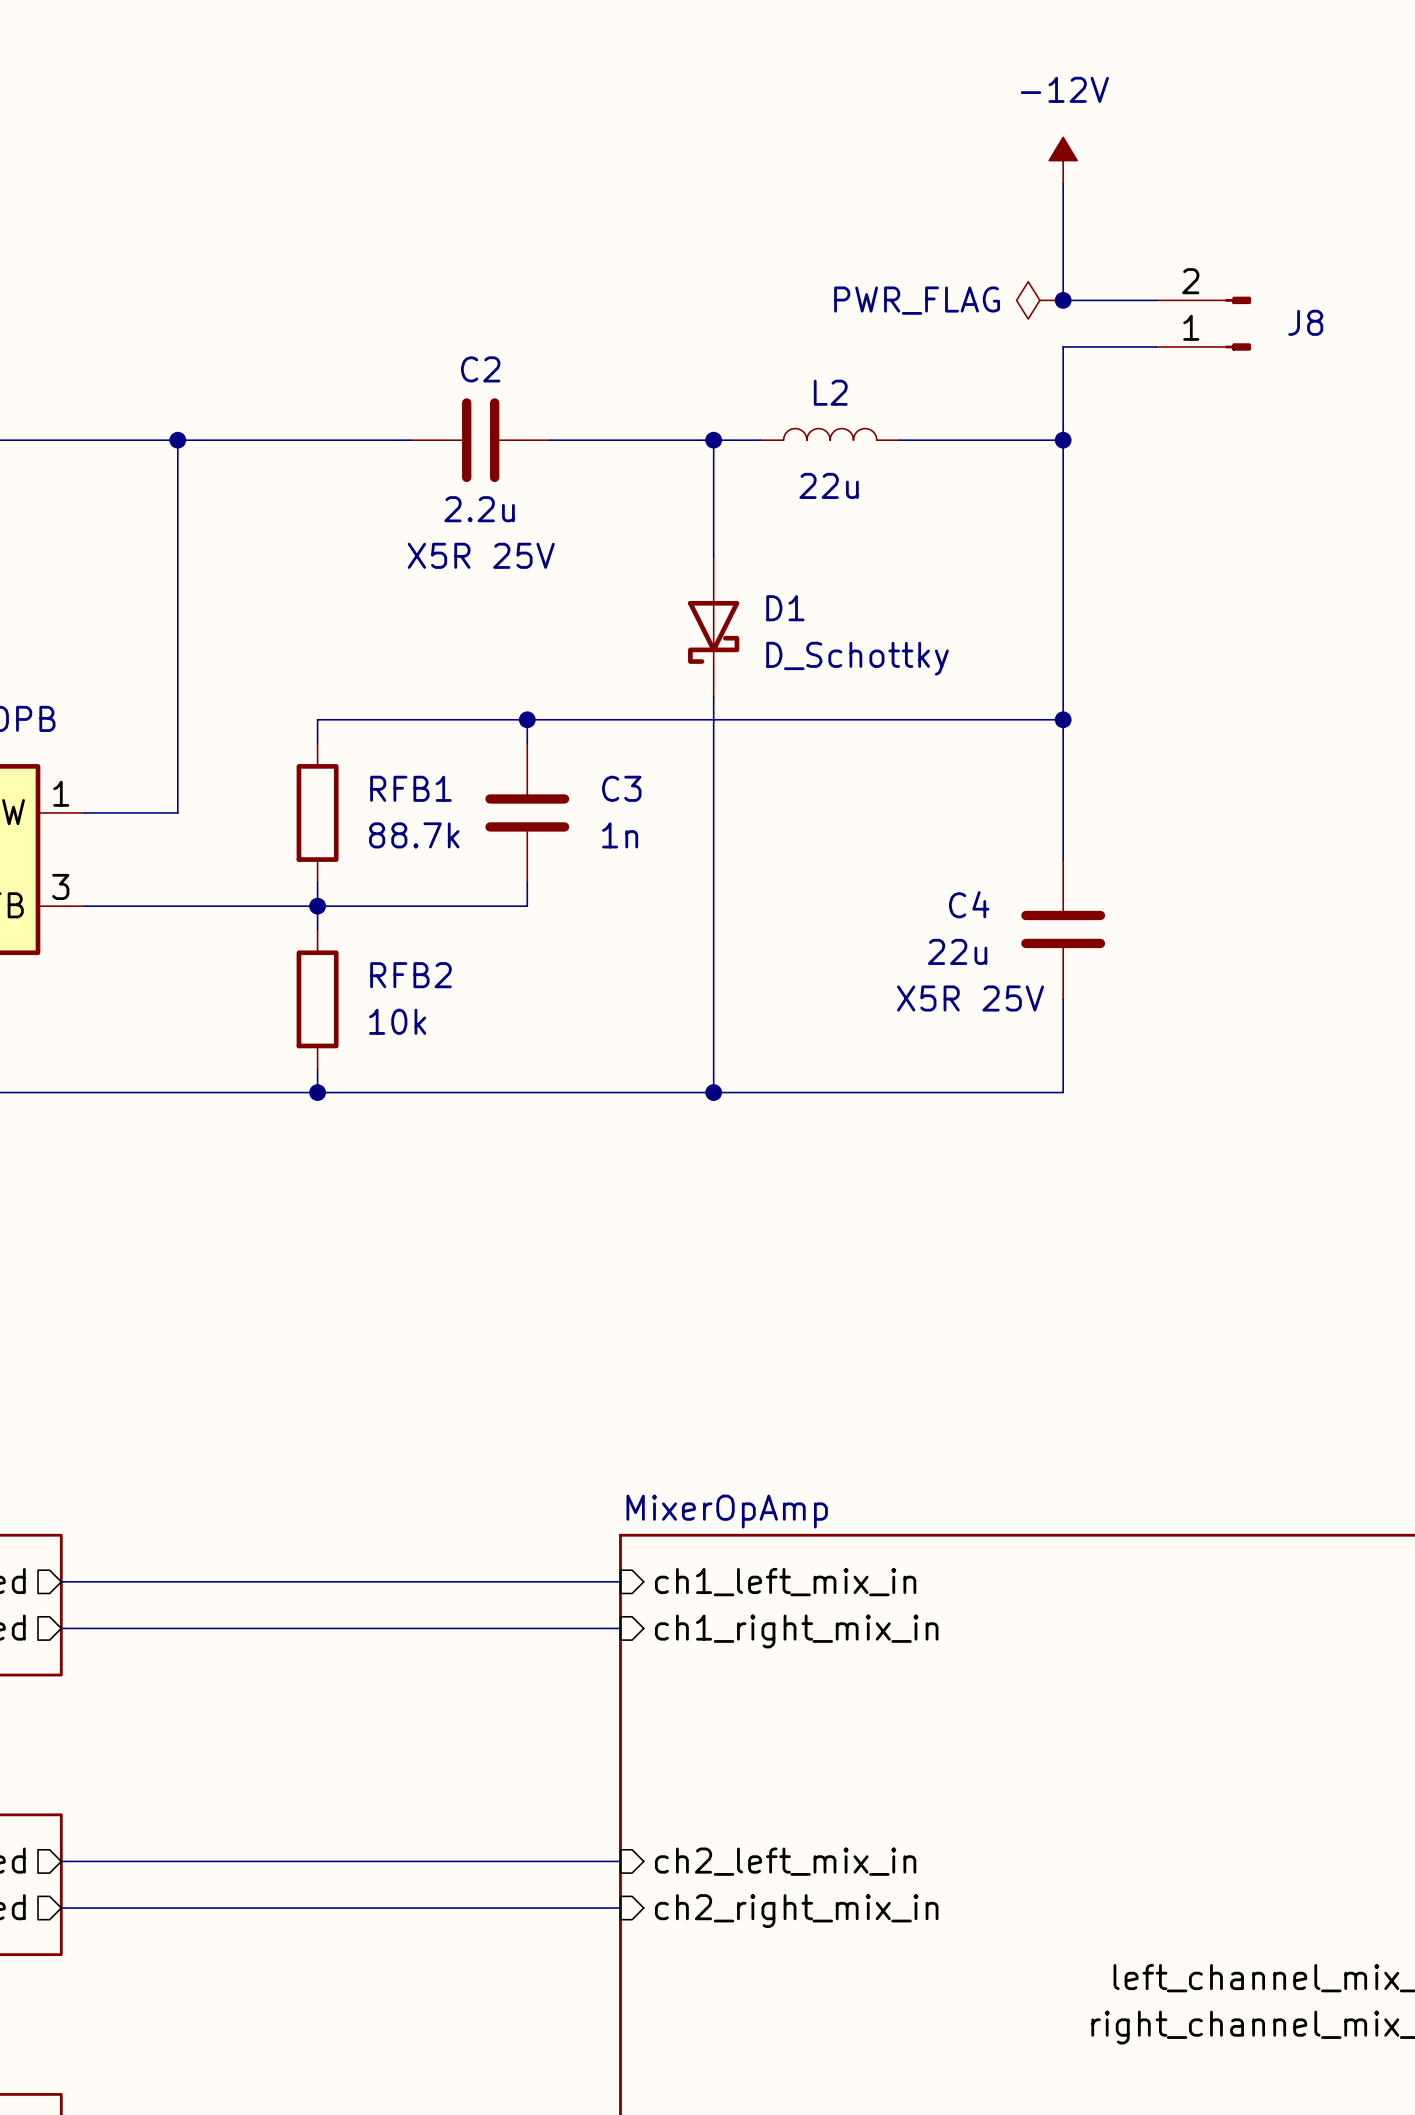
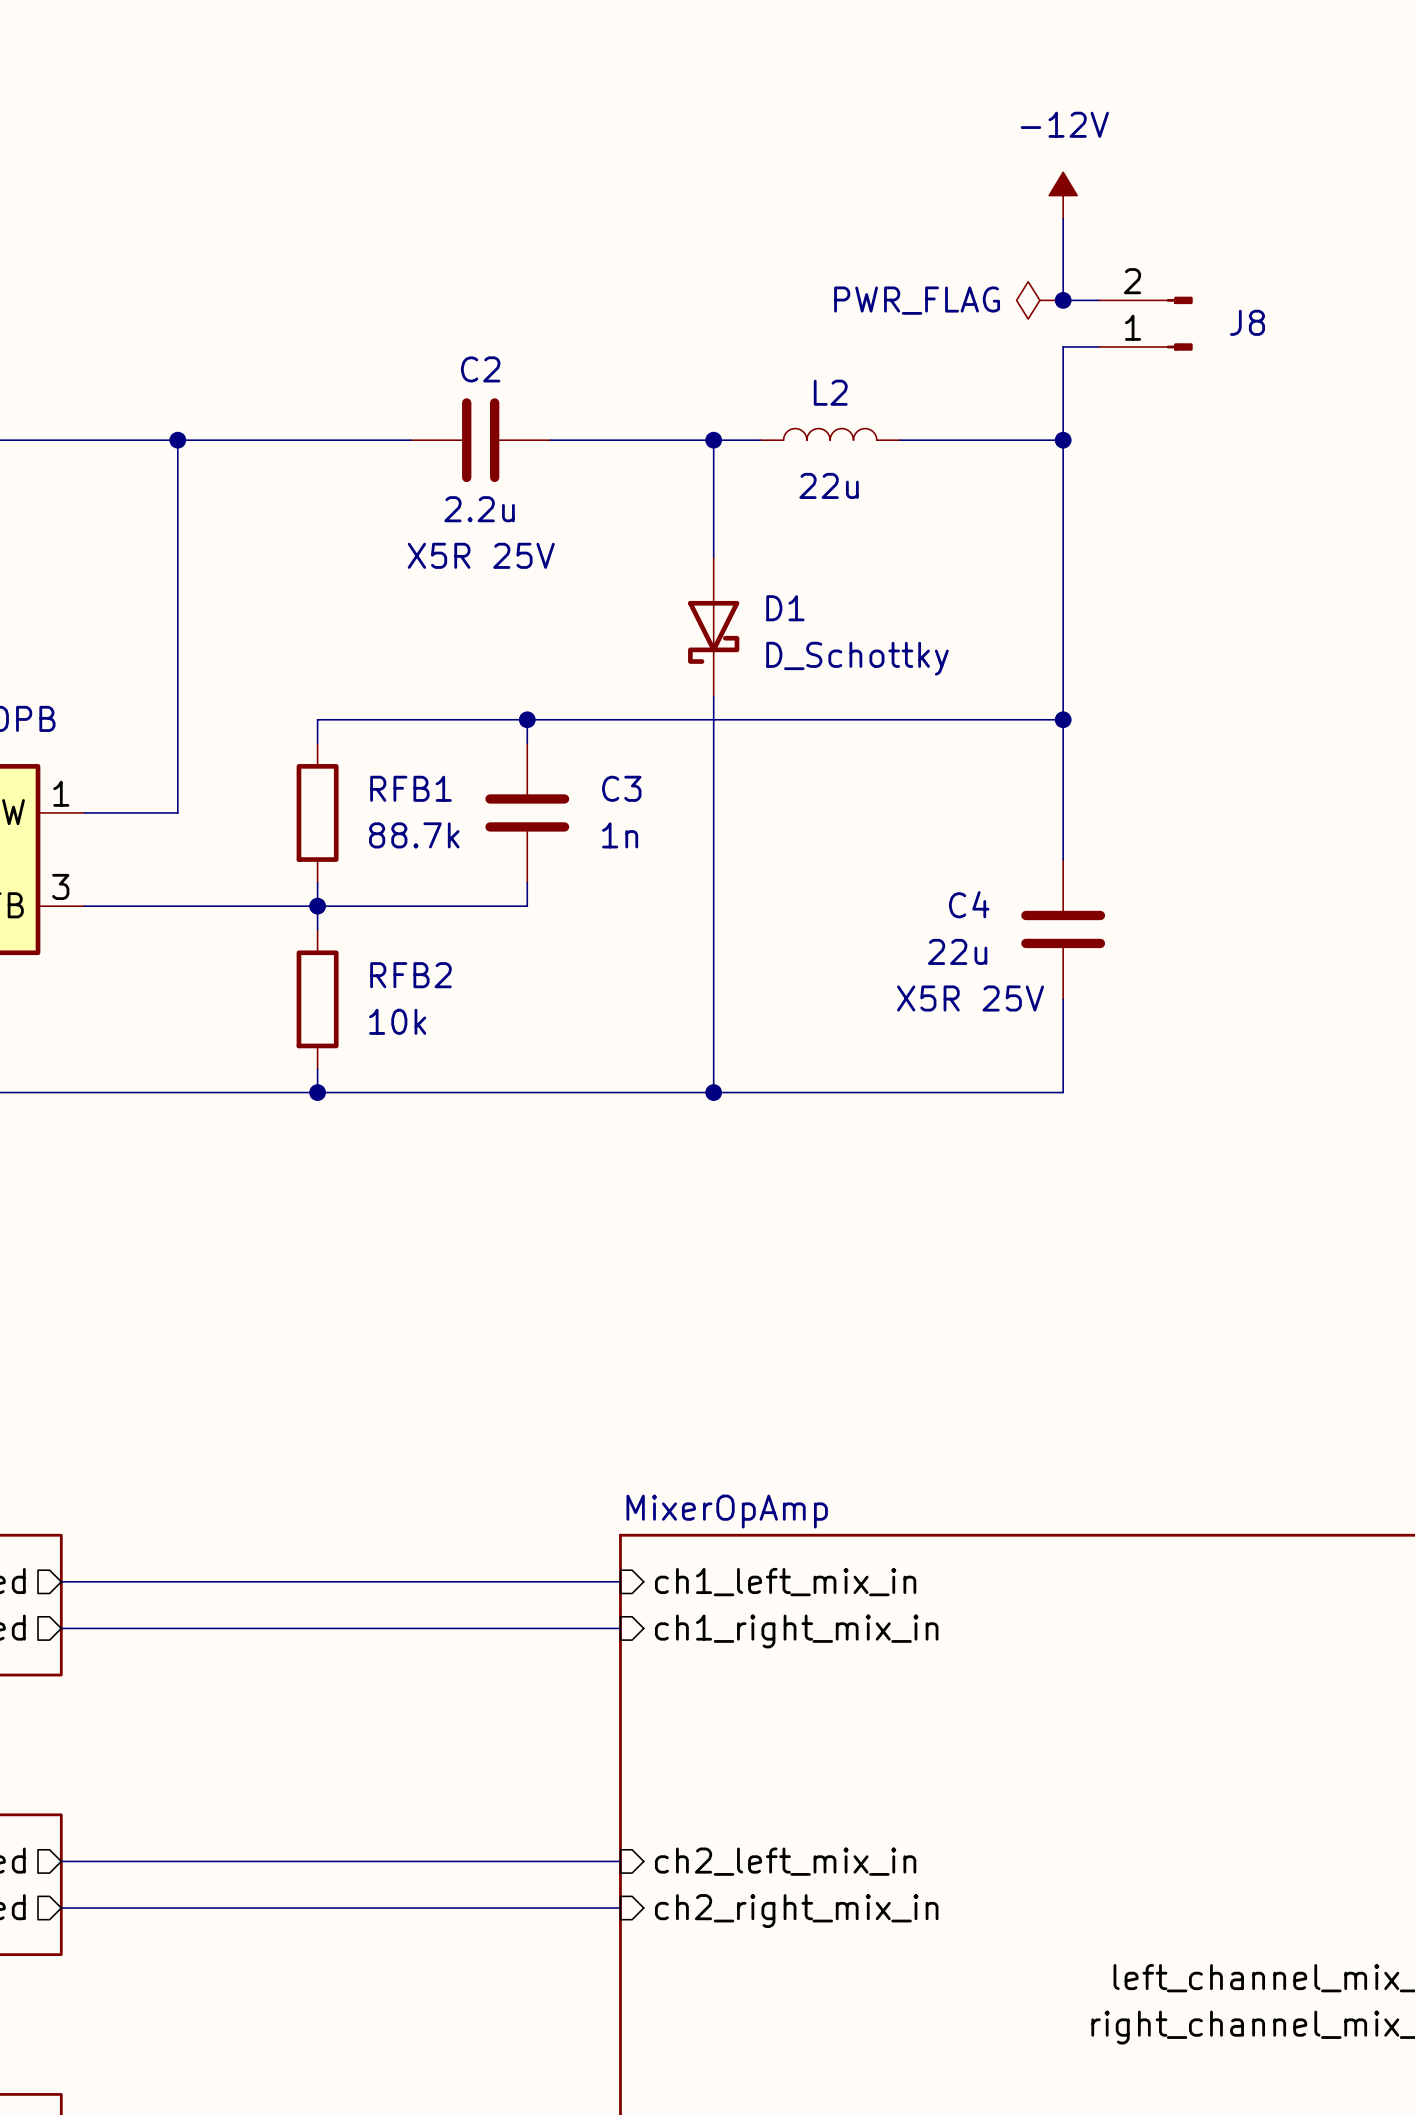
power symbol position: -12V (1063, 160) -> -12V (1063, 195)
J8 position: (1203, 323) -> (1145, 323)

